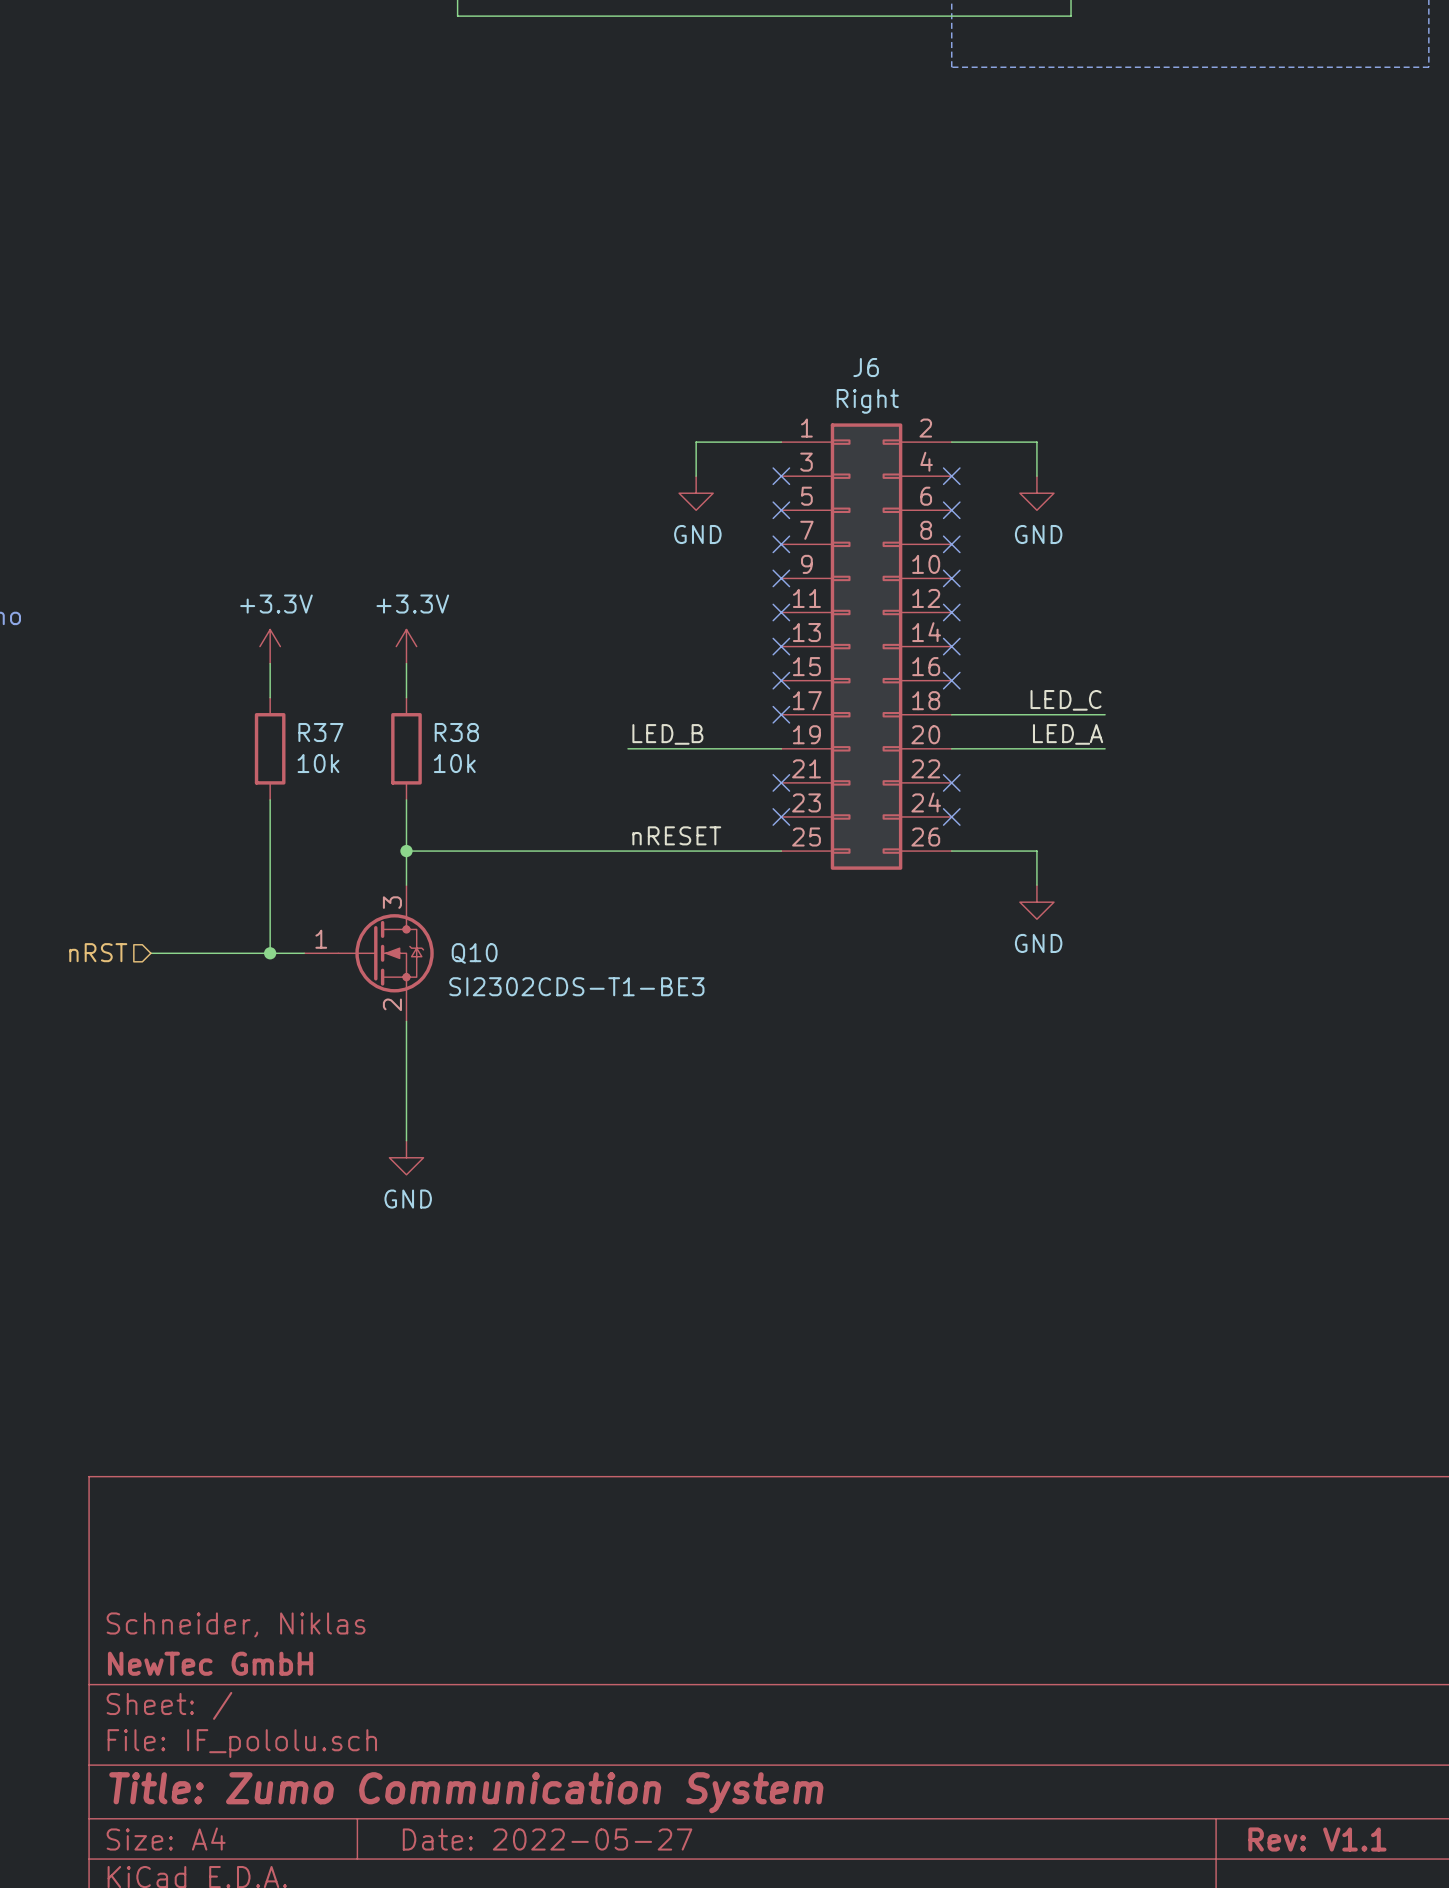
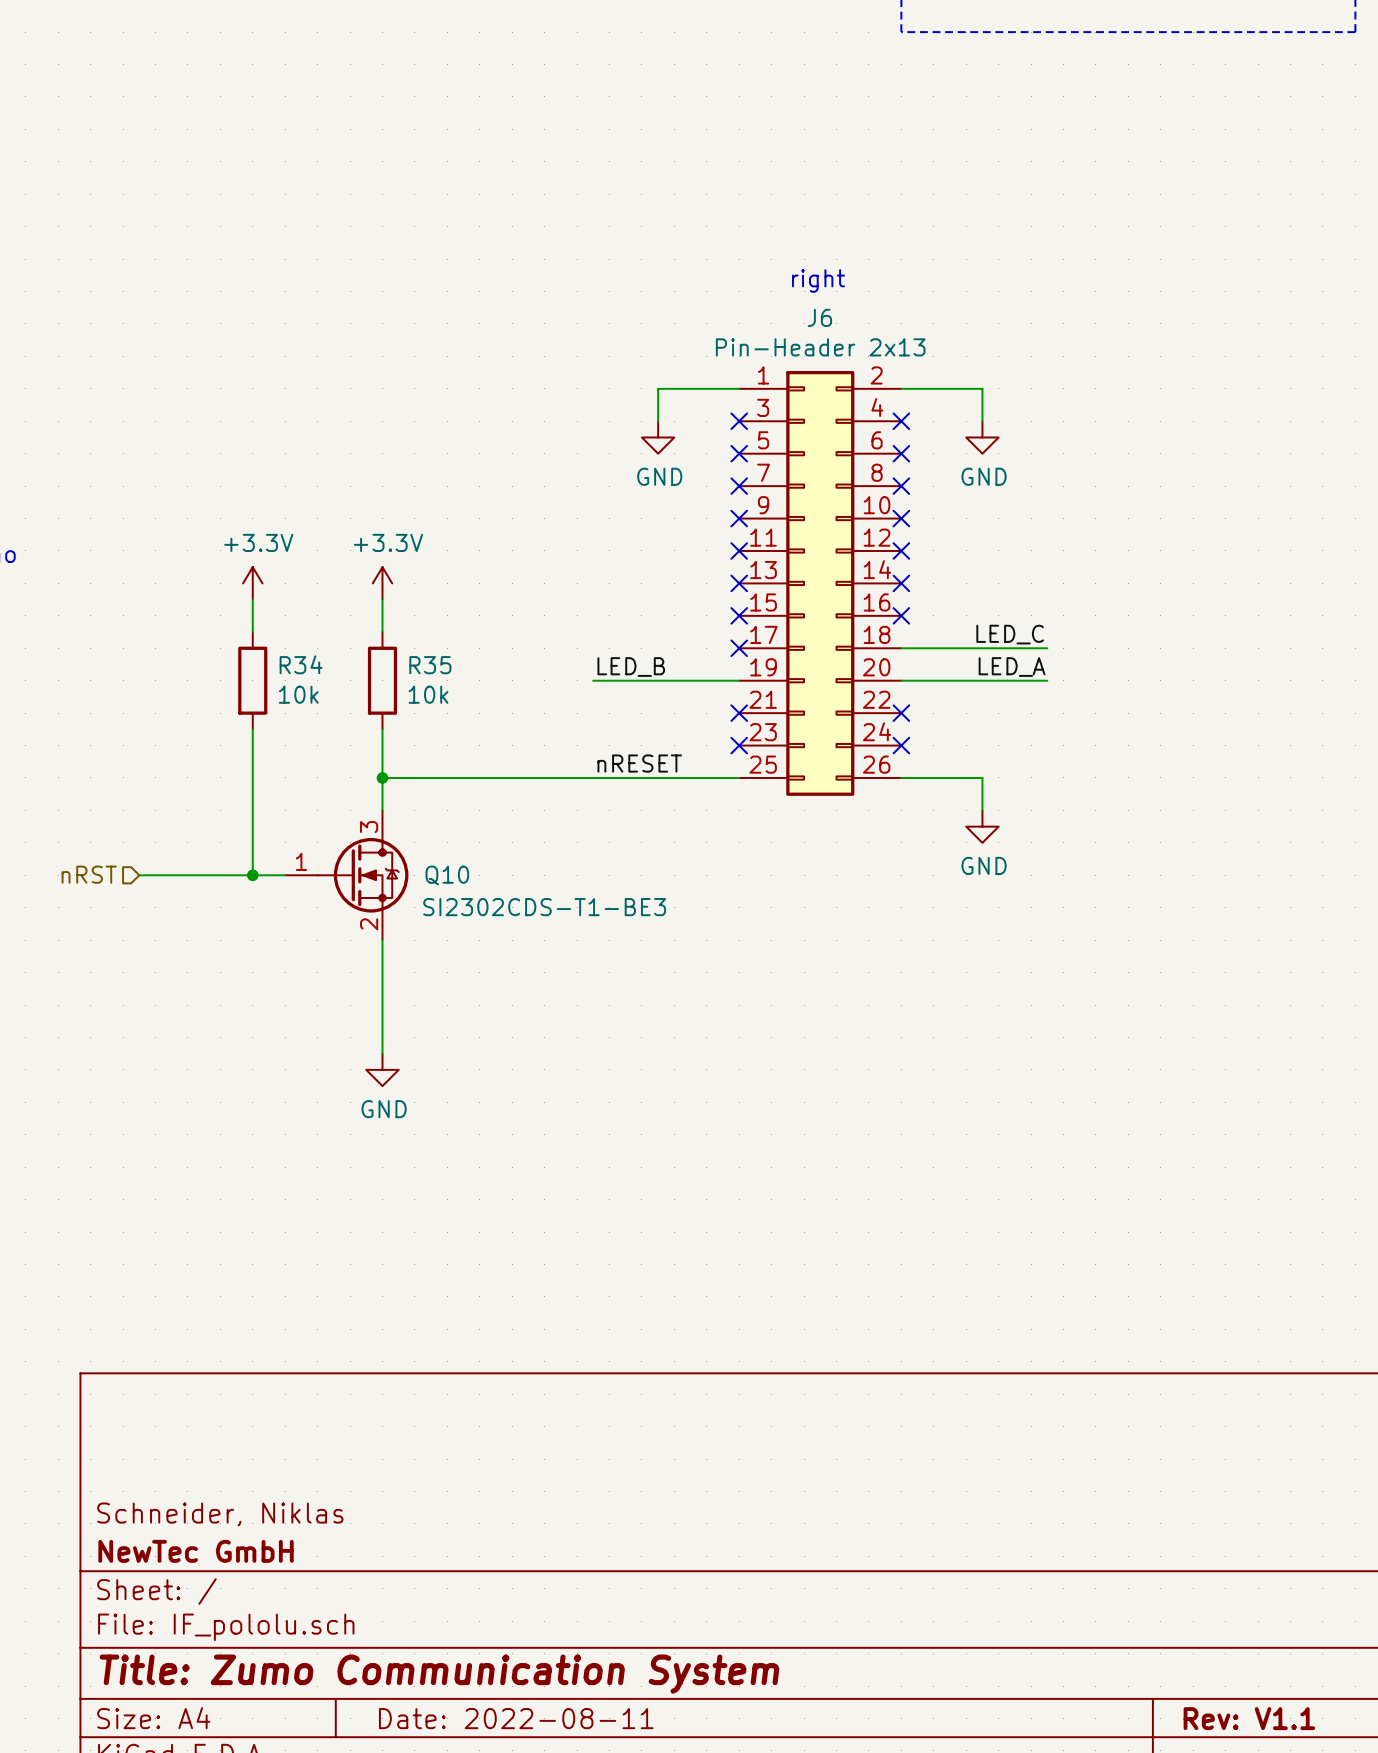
text: none -> right (818, 280)
J6 value: Right (867, 401) -> Pin-Header 2x13 (820, 347)
R37 name: R37 (320, 732) -> R34 (301, 664)
R38 name: R38 (456, 732) -> R35 (430, 665)
title block: Date: 2022-05-27 (547, 1839) -> Date: 2022-08-11 (516, 1718)

